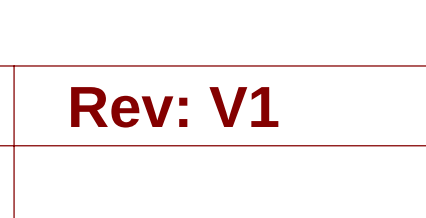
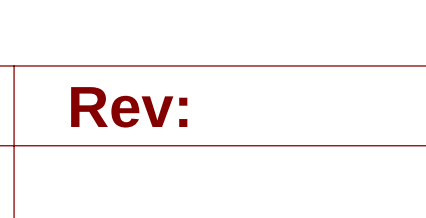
title block: Rev: V1 (174, 107) -> Rev: (129, 107)

